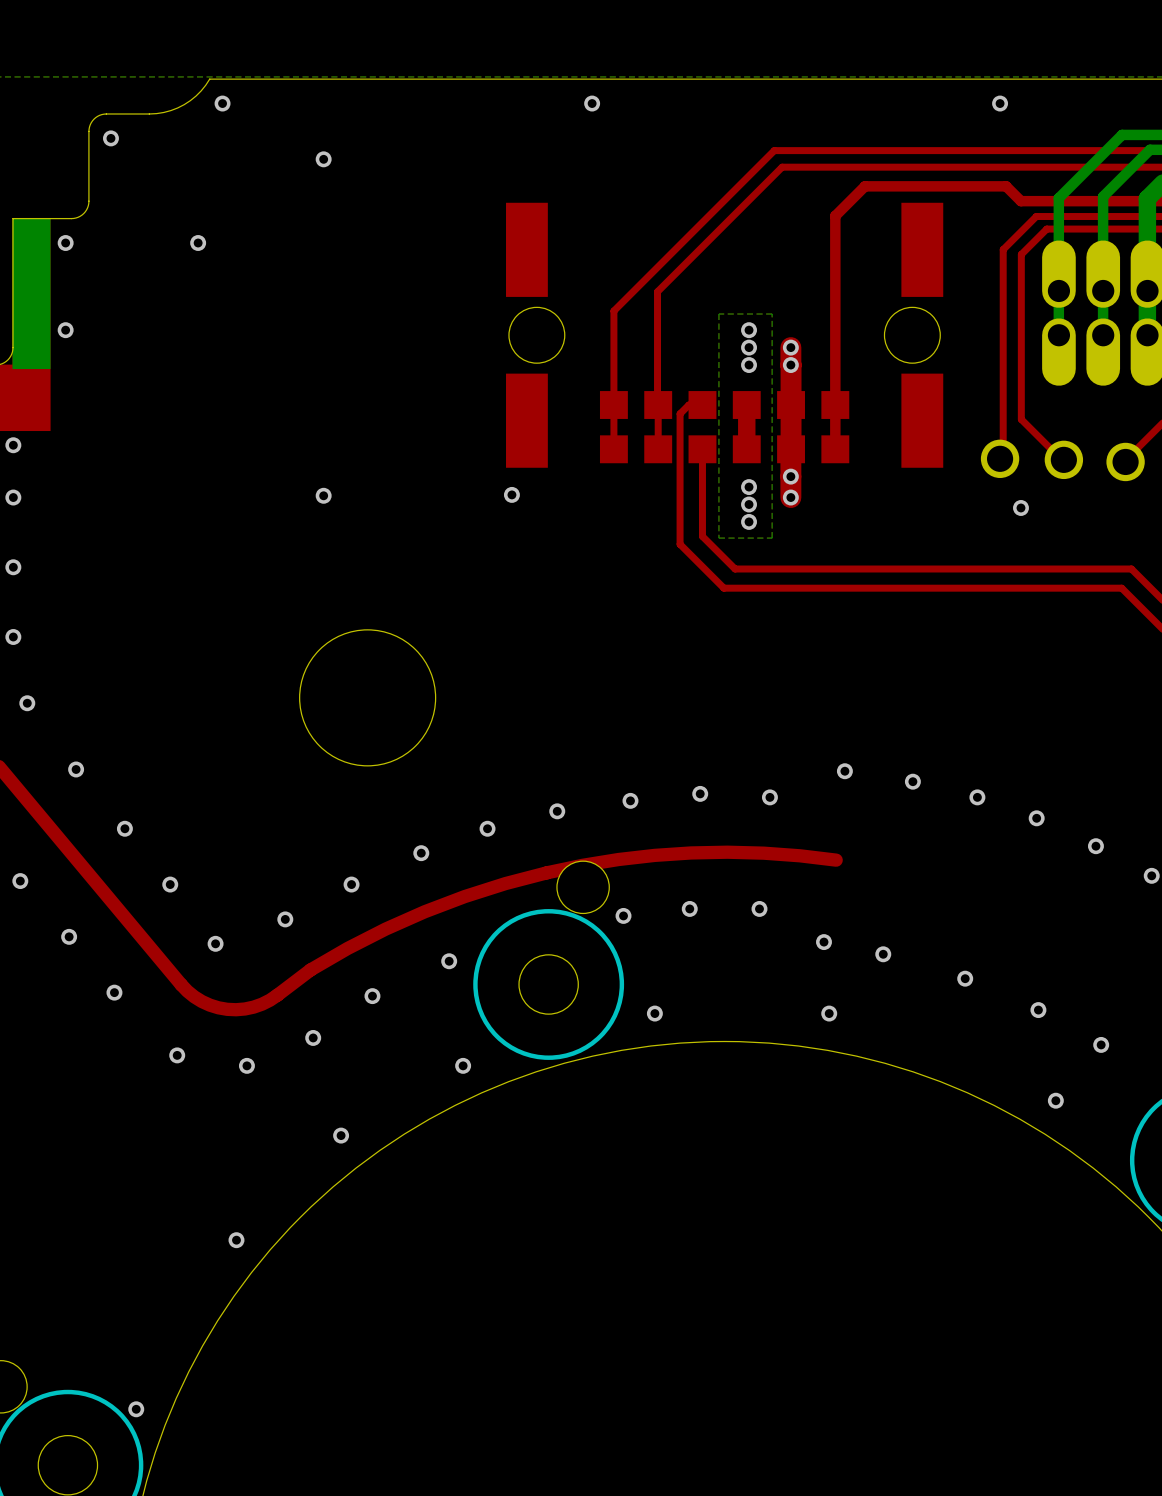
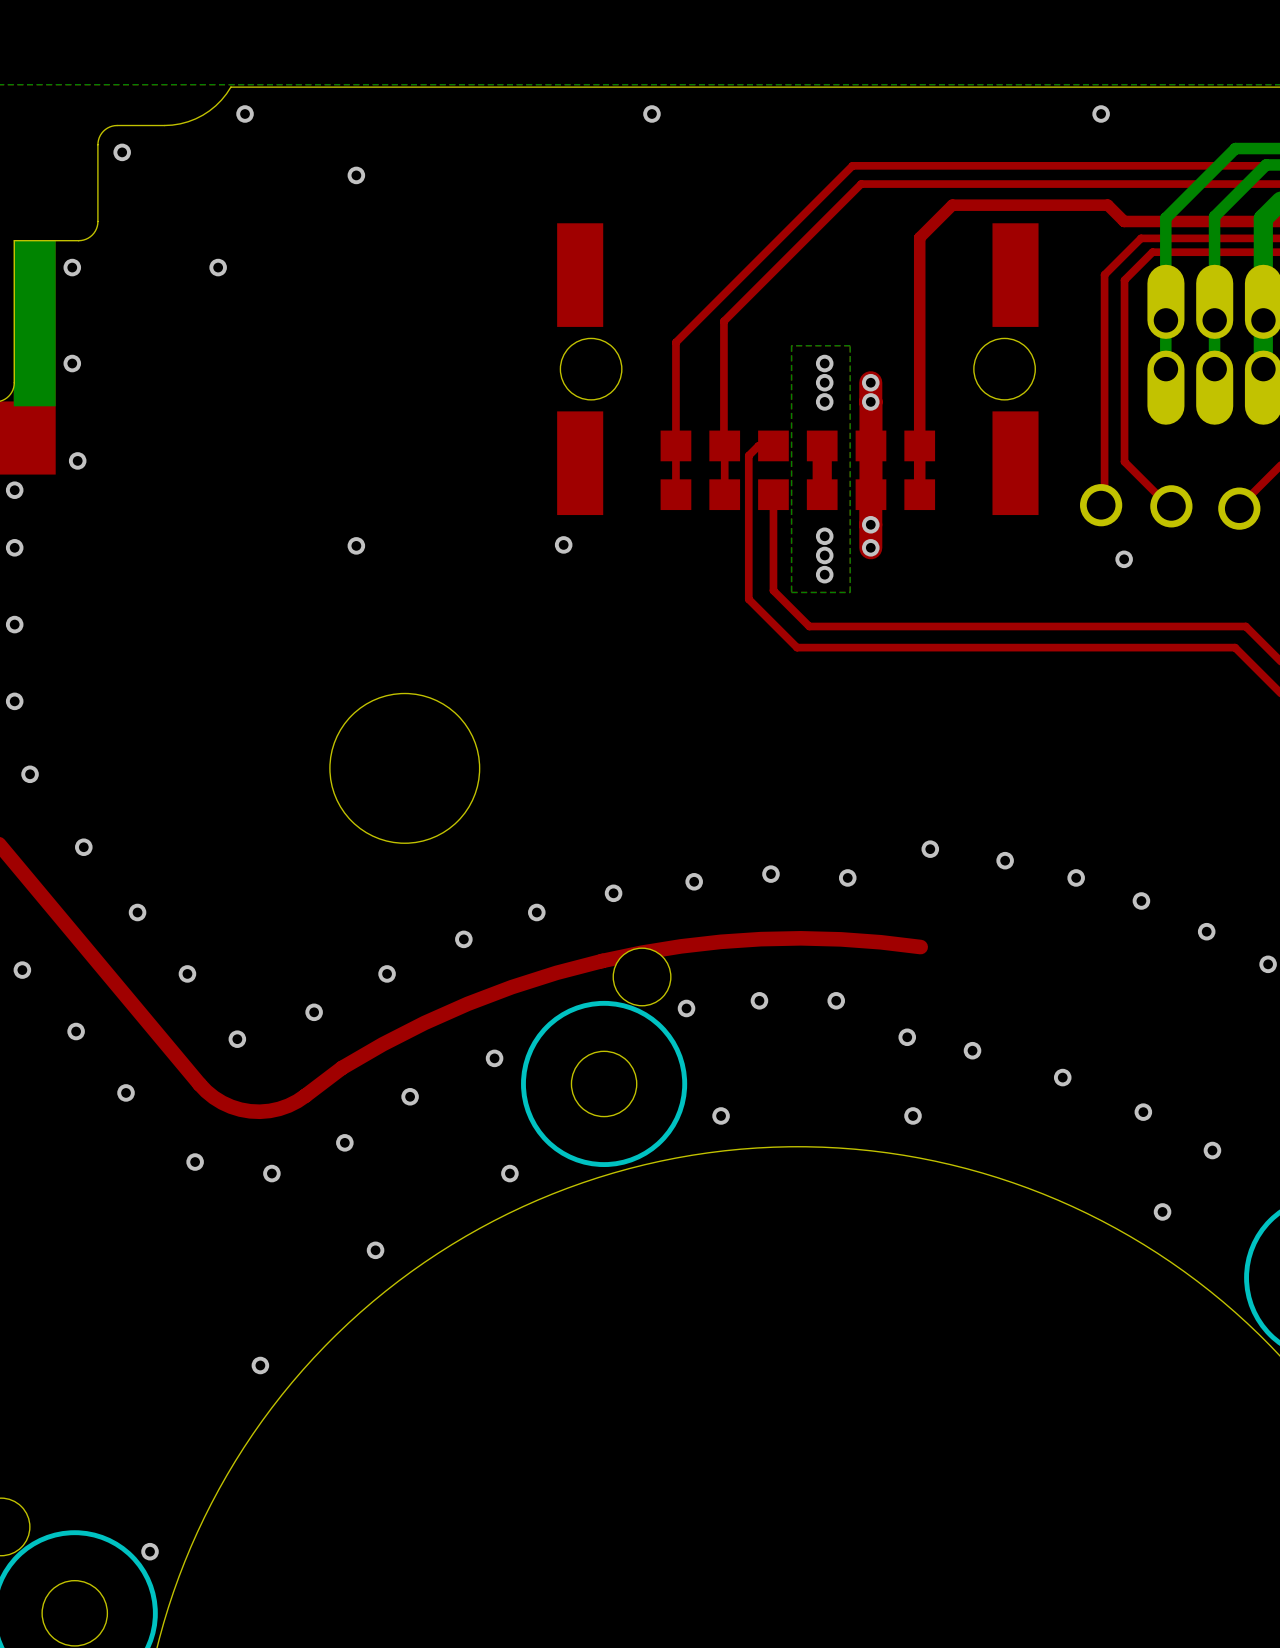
via: none -> (77, 460)

